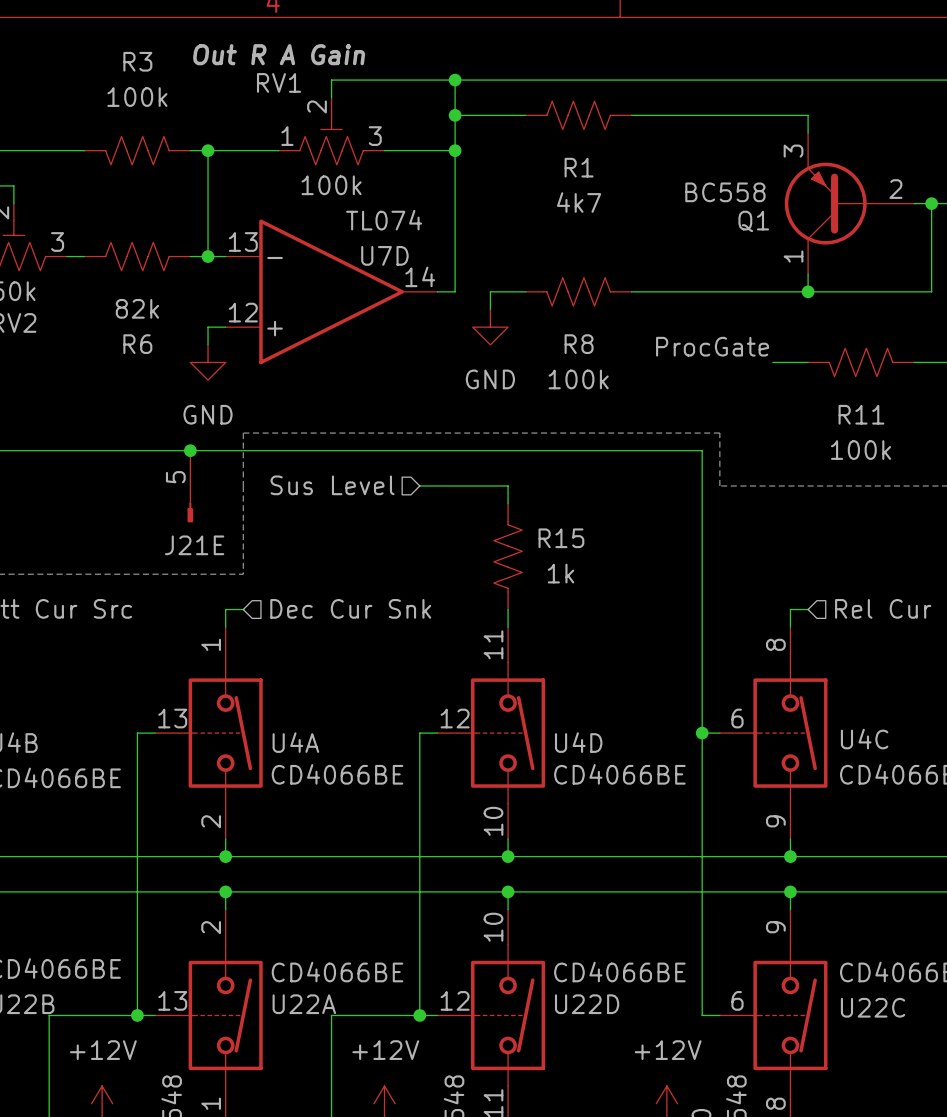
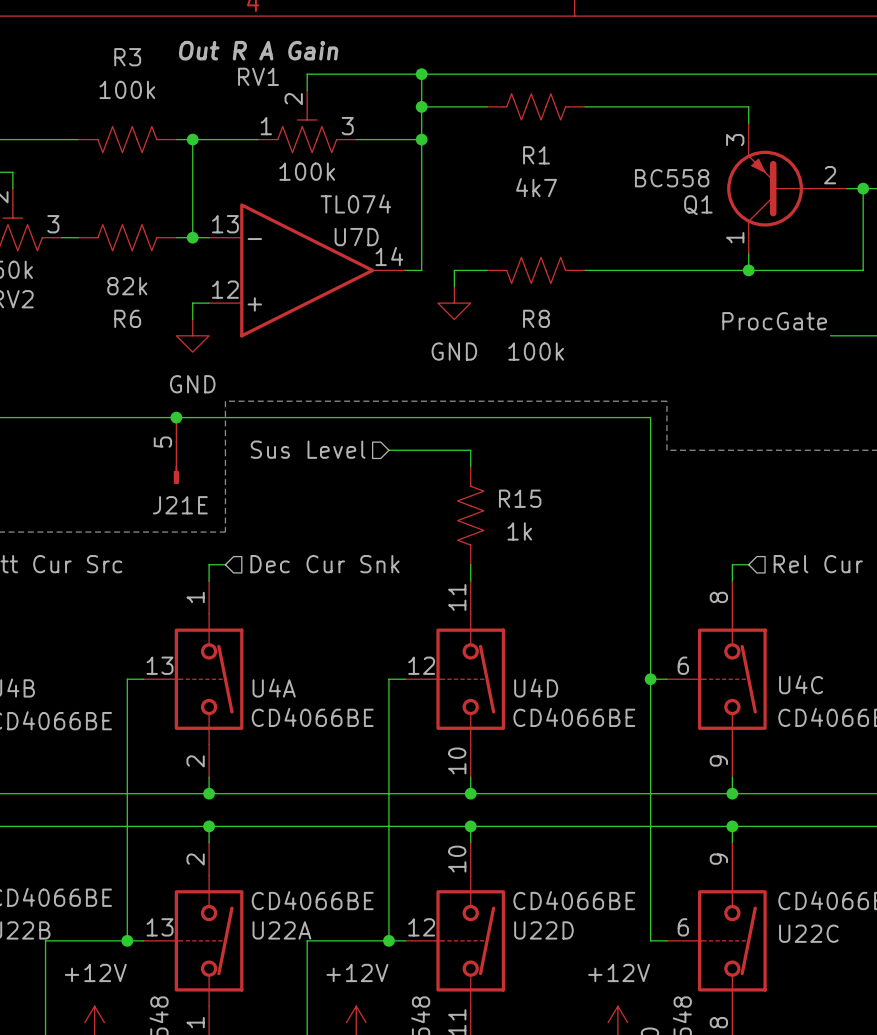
label position: ProcGate (712, 346) -> ProcGate (774, 321)
wire: (772, 362) (808, 362) -> none
R11: 100k (861, 362) -> none

